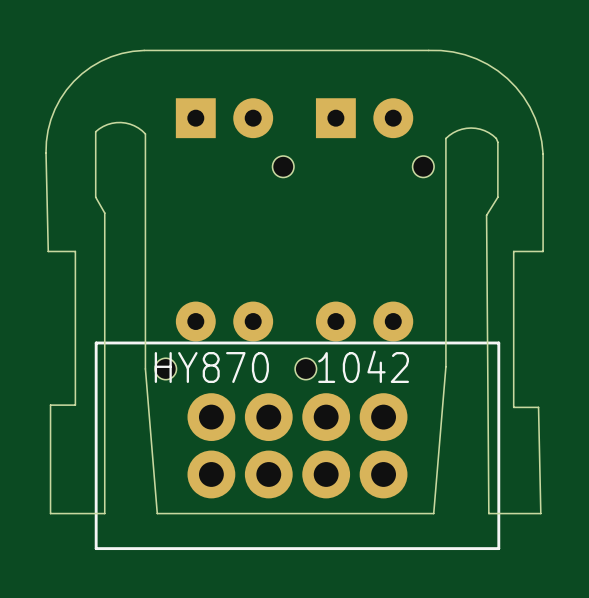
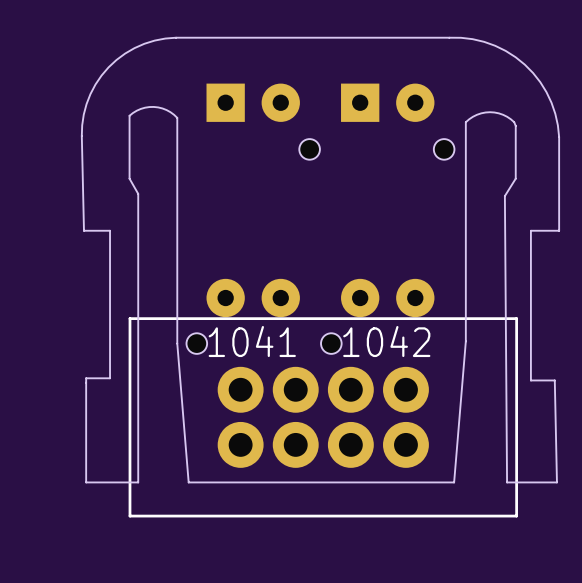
text: HY870 (211, 367) -> 1041 (252, 341)

